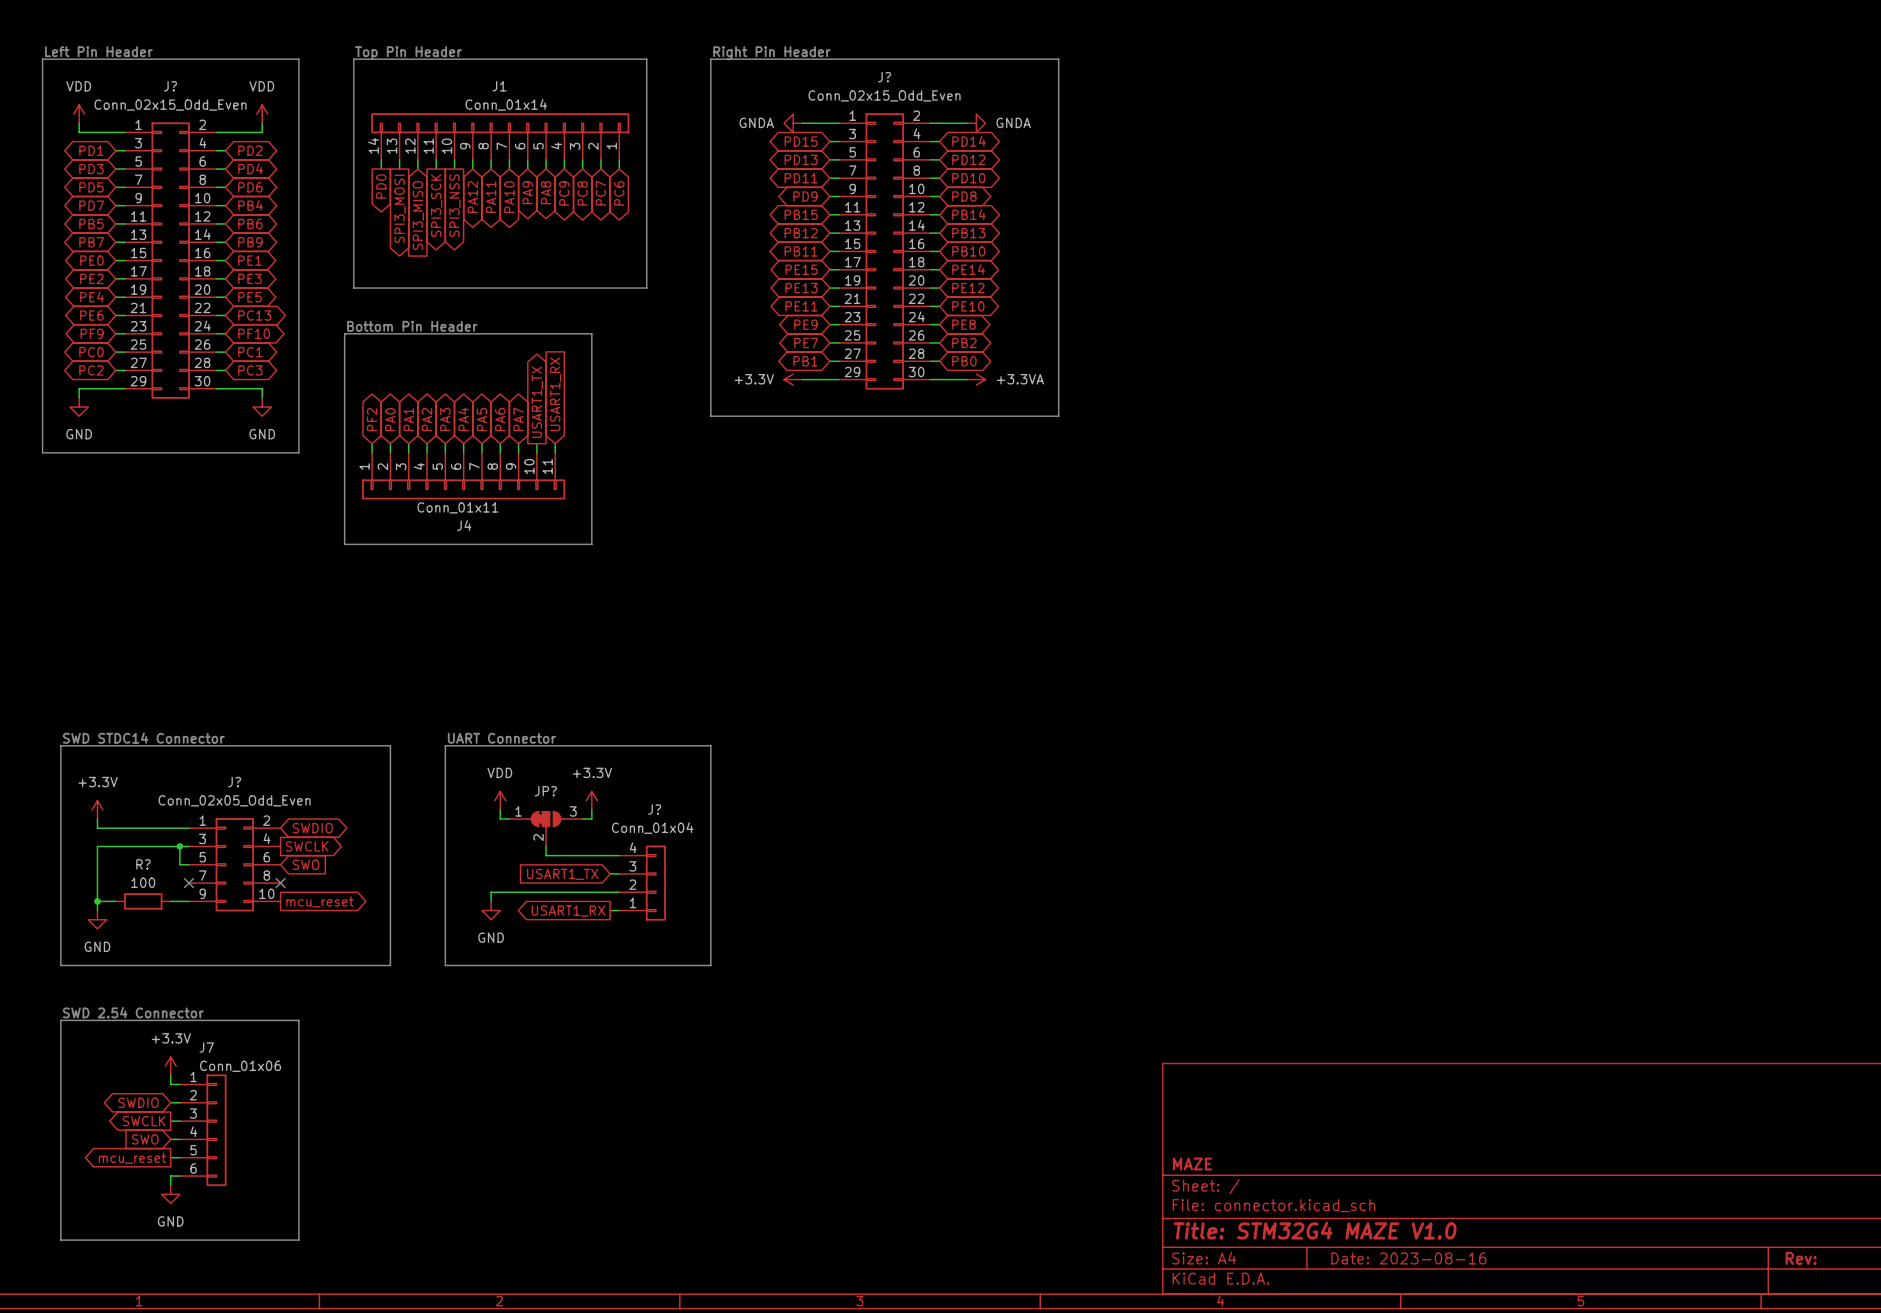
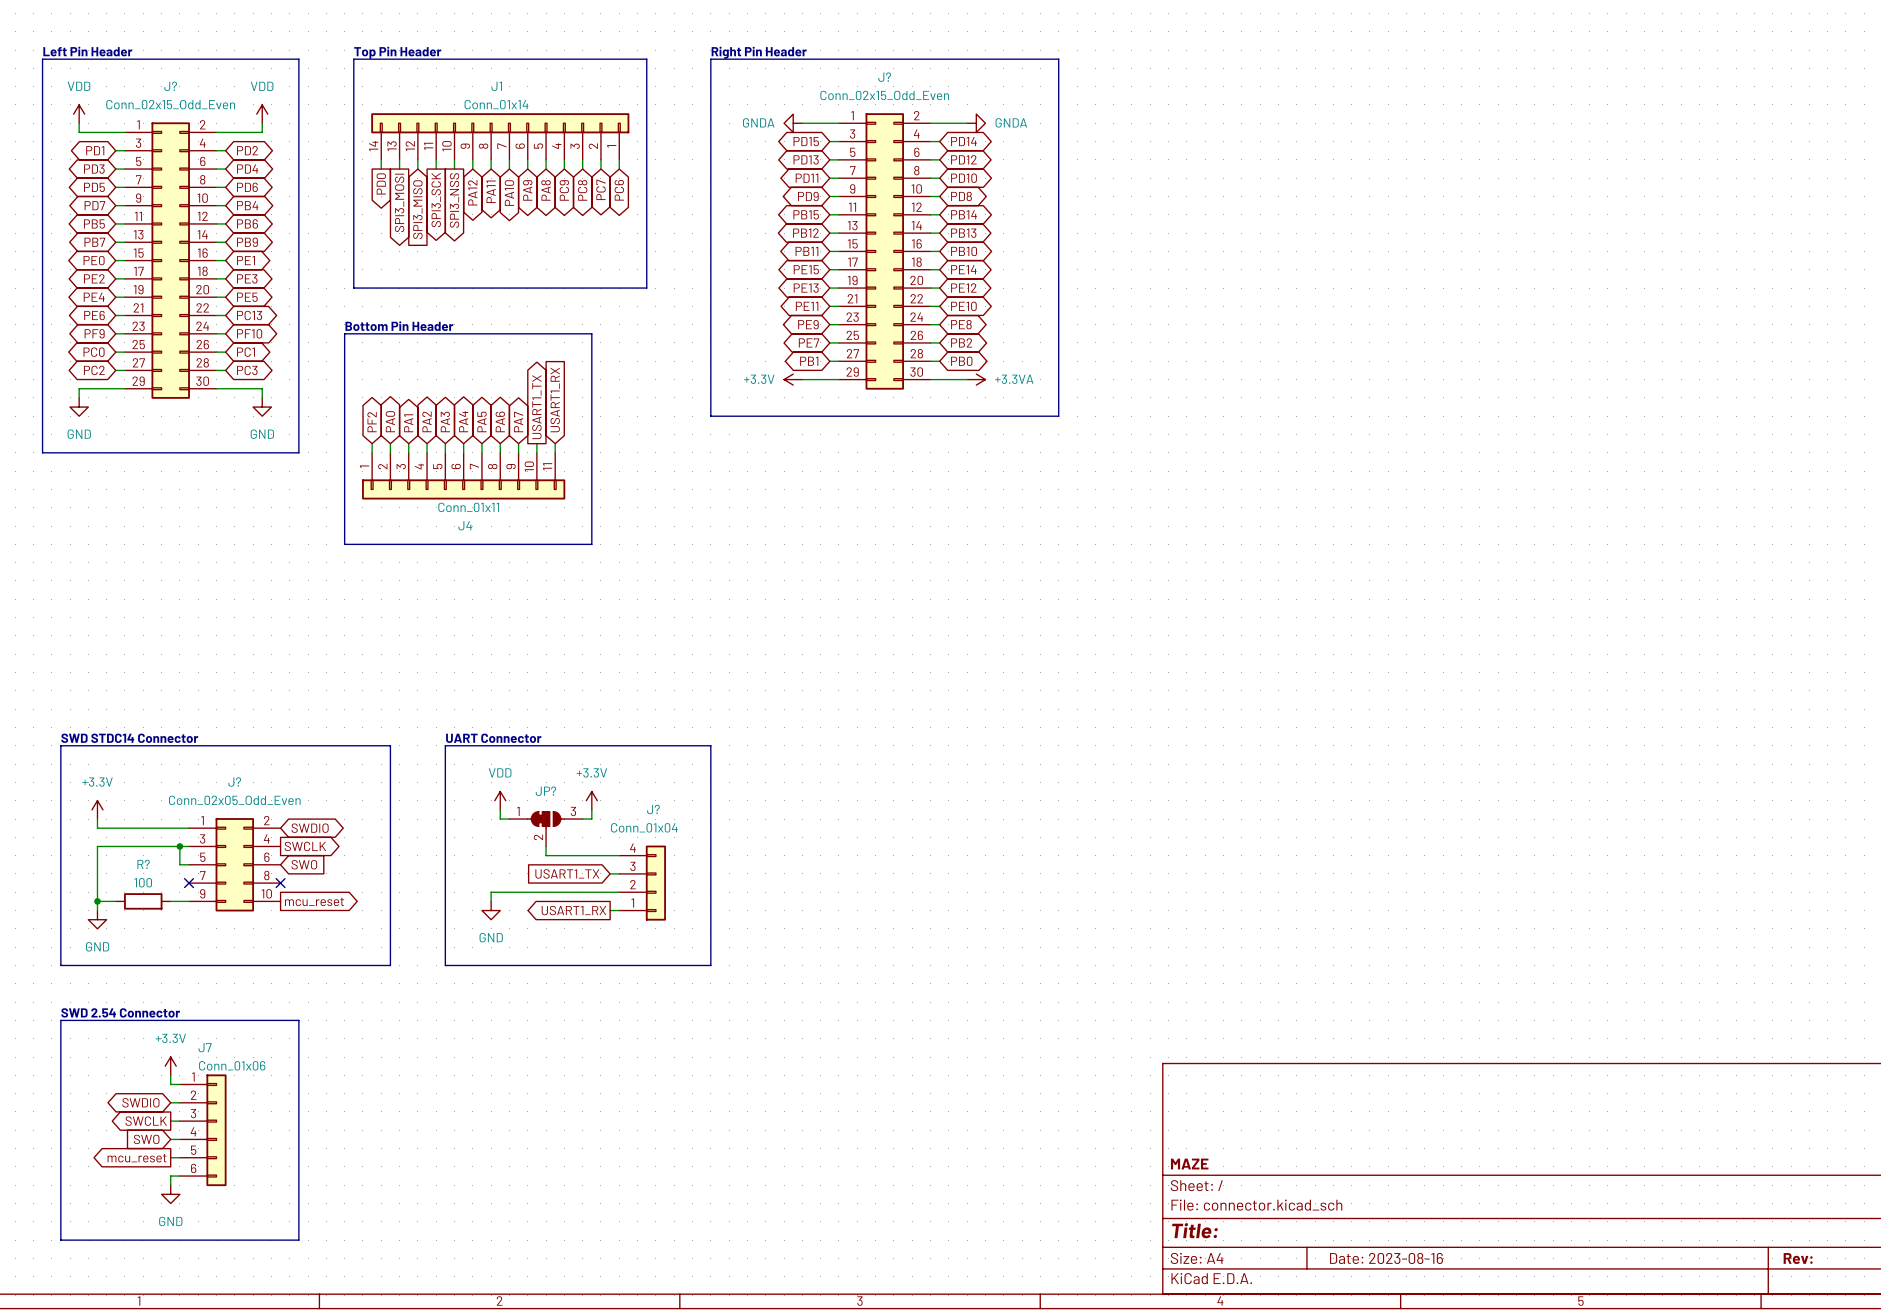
title block: Title: STM32G4 MAZE V1.0 (1315, 1230) -> Title: (1194, 1230)

